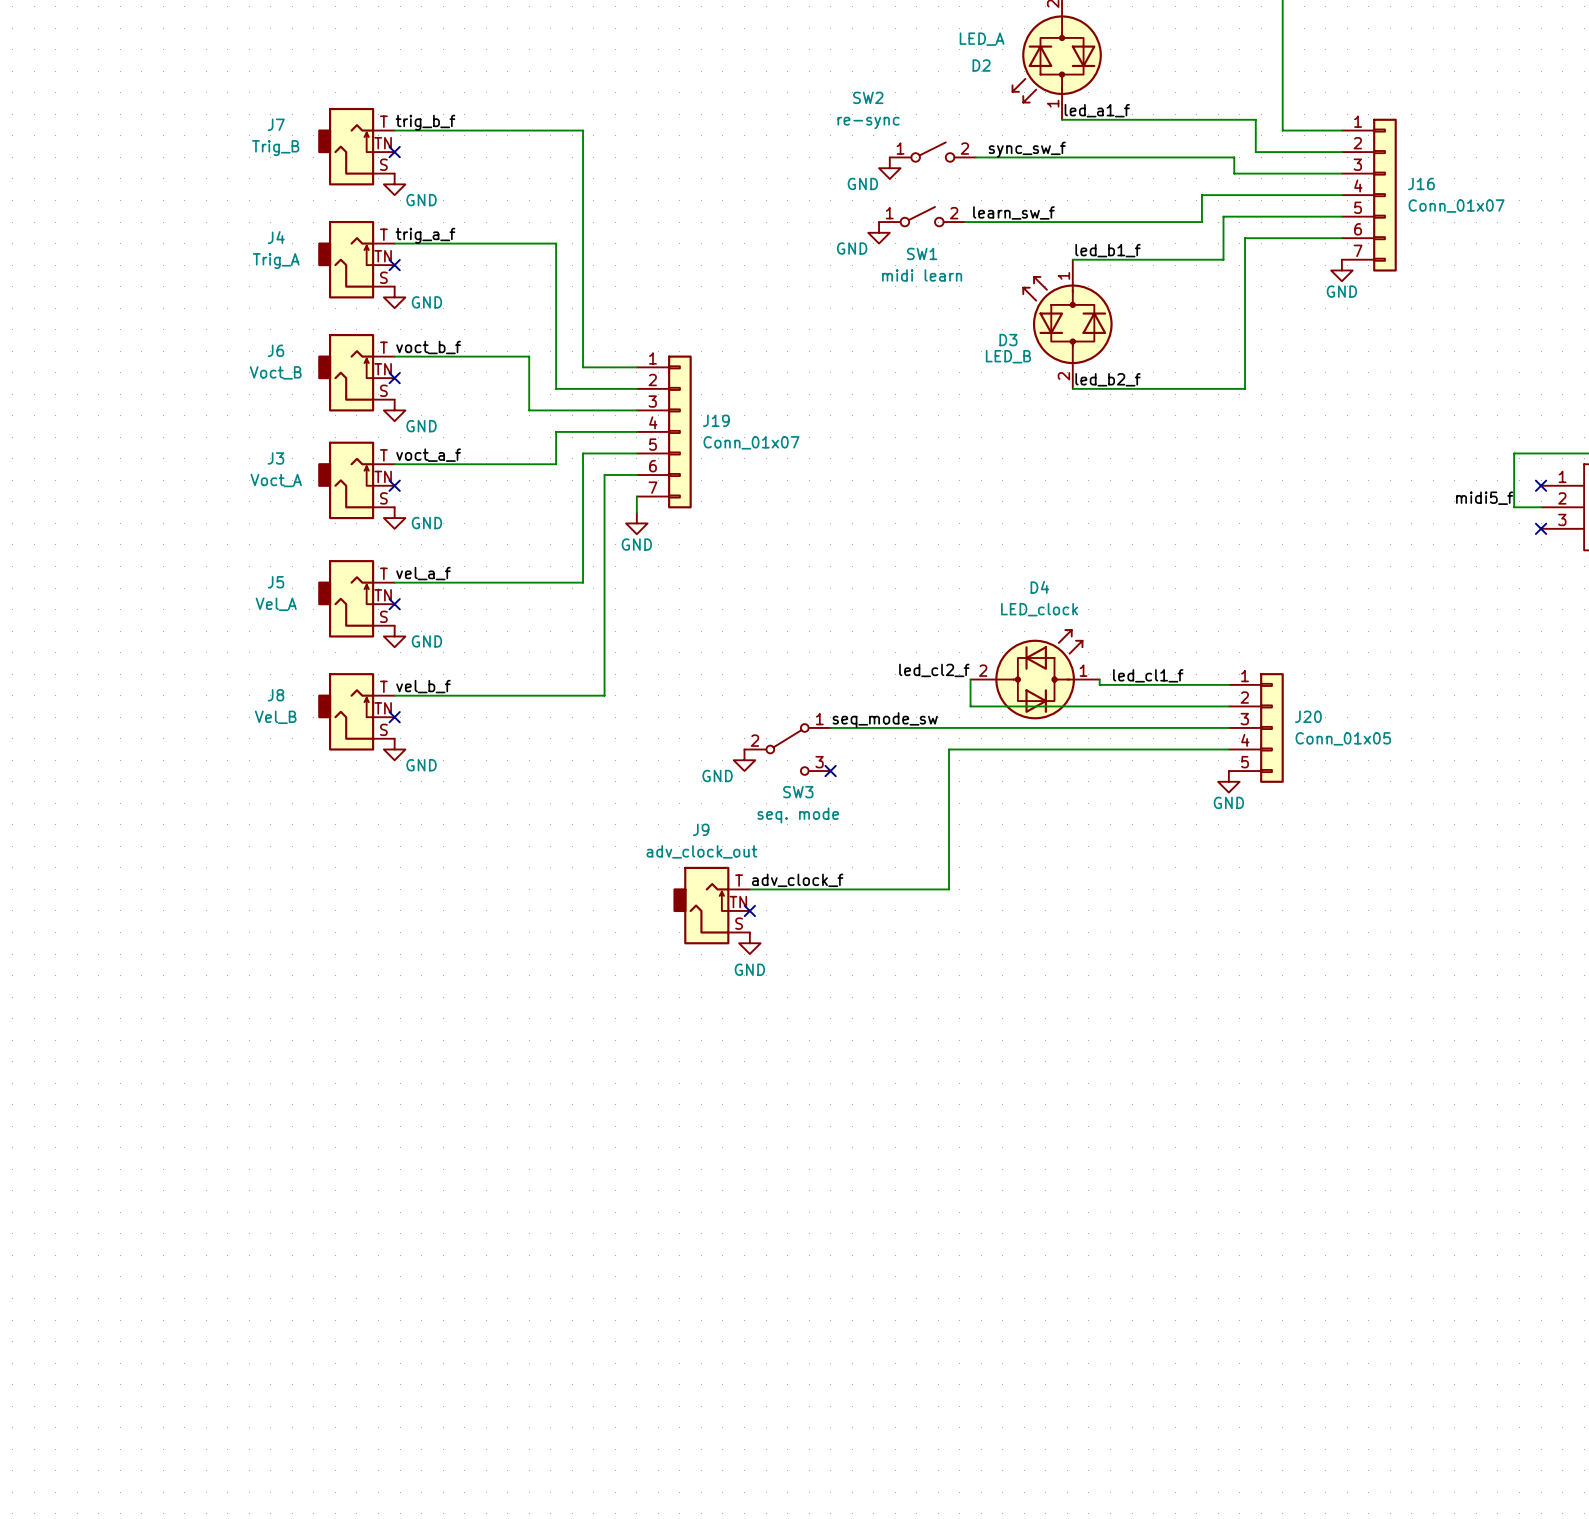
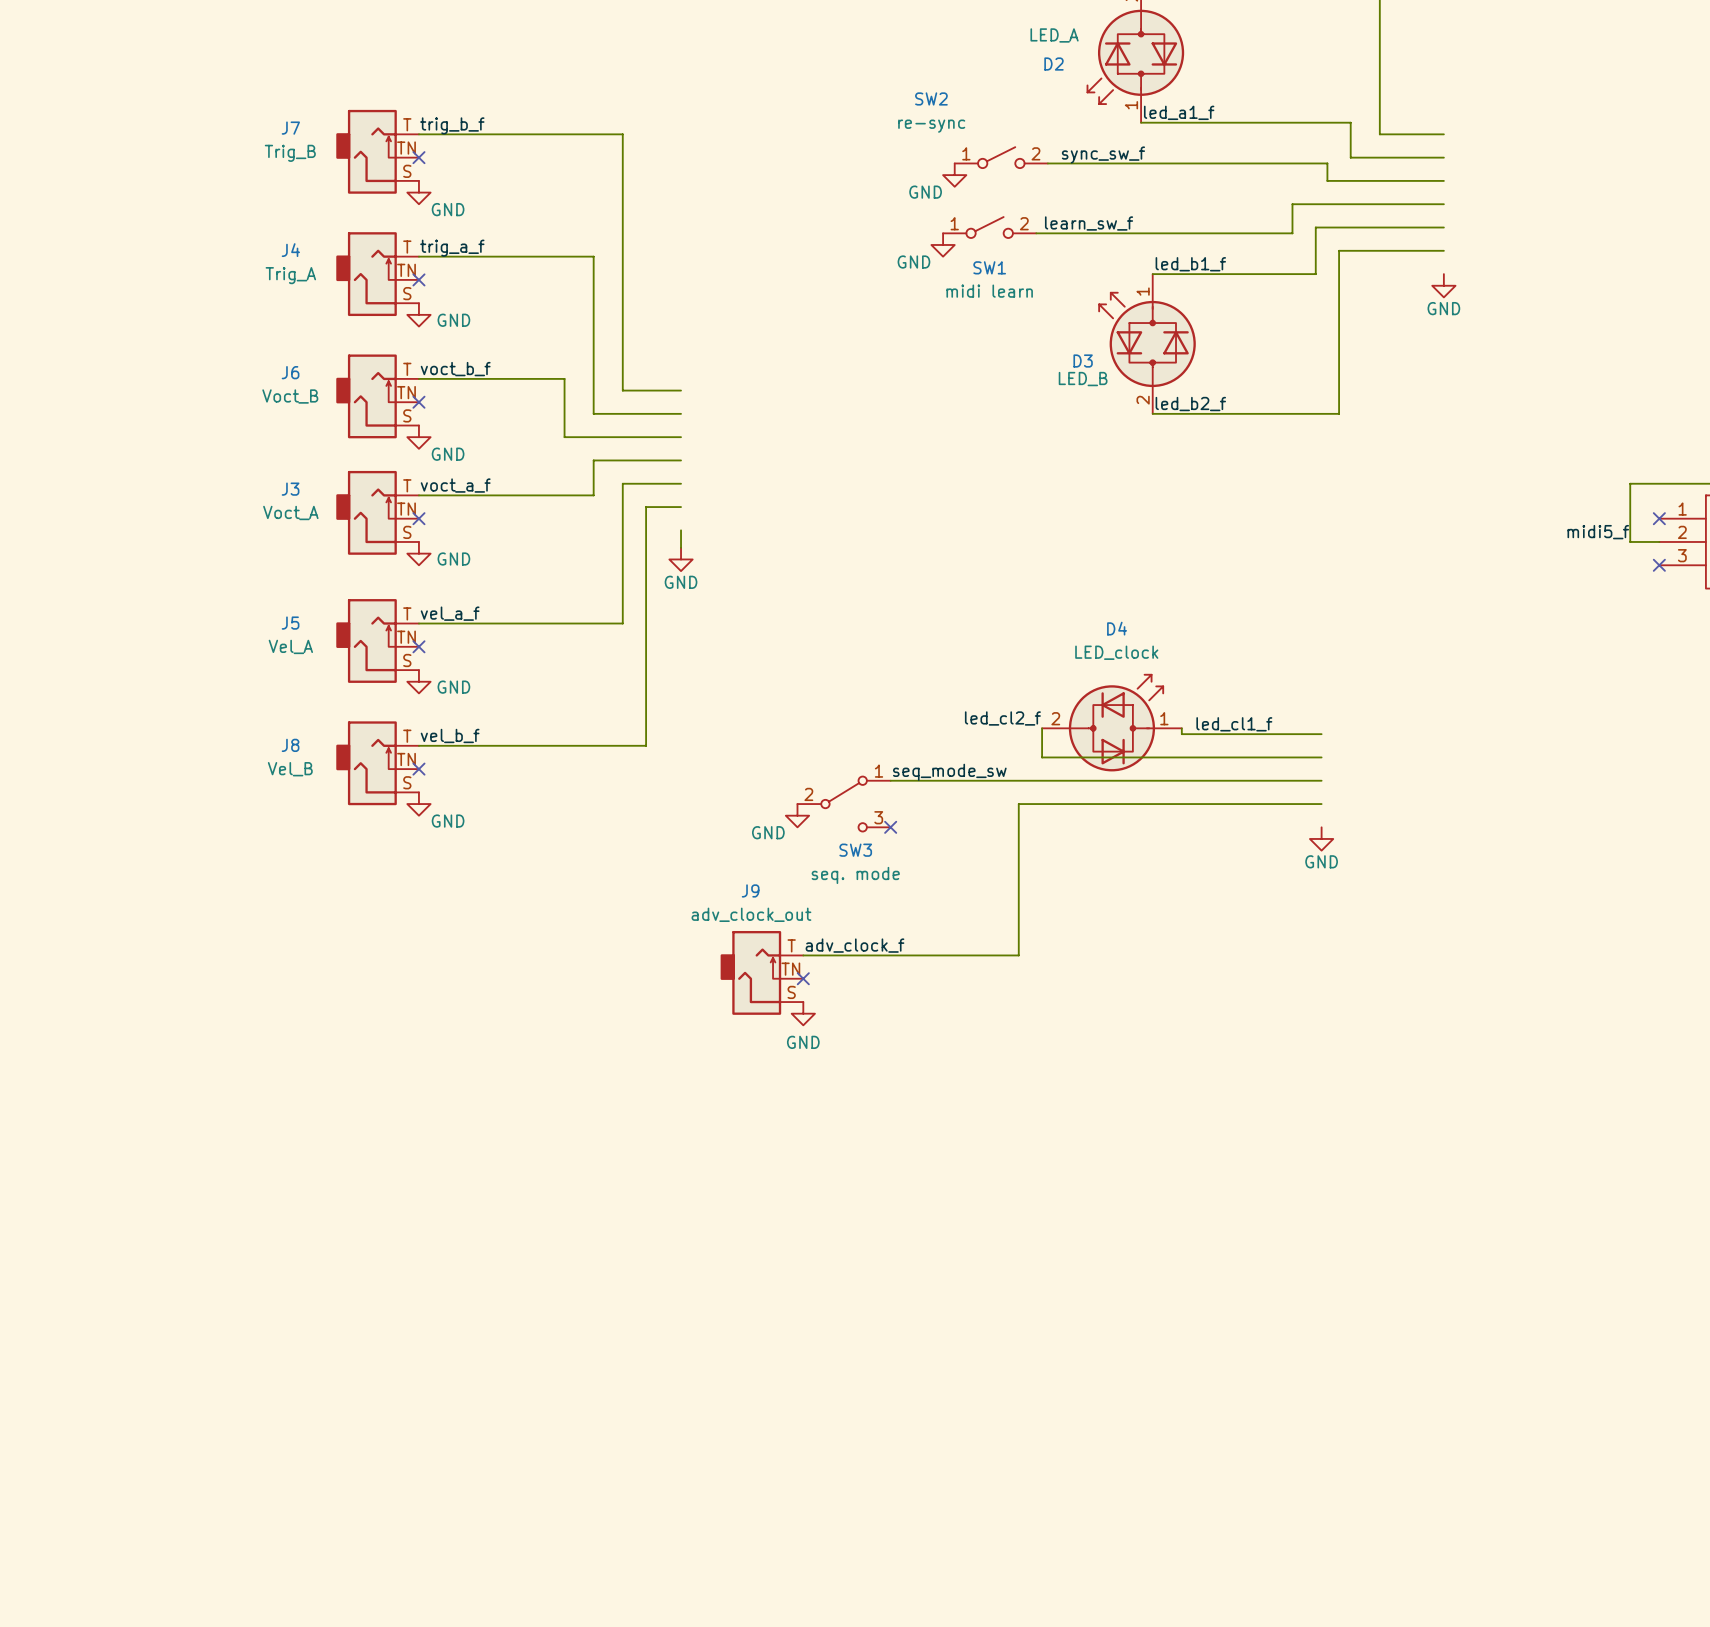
J16: Conn_01x07 (1369, 195) -> none
J19: Conn_01x07 (664, 431) -> none
J20: Conn_01x05 (1256, 727) -> none

